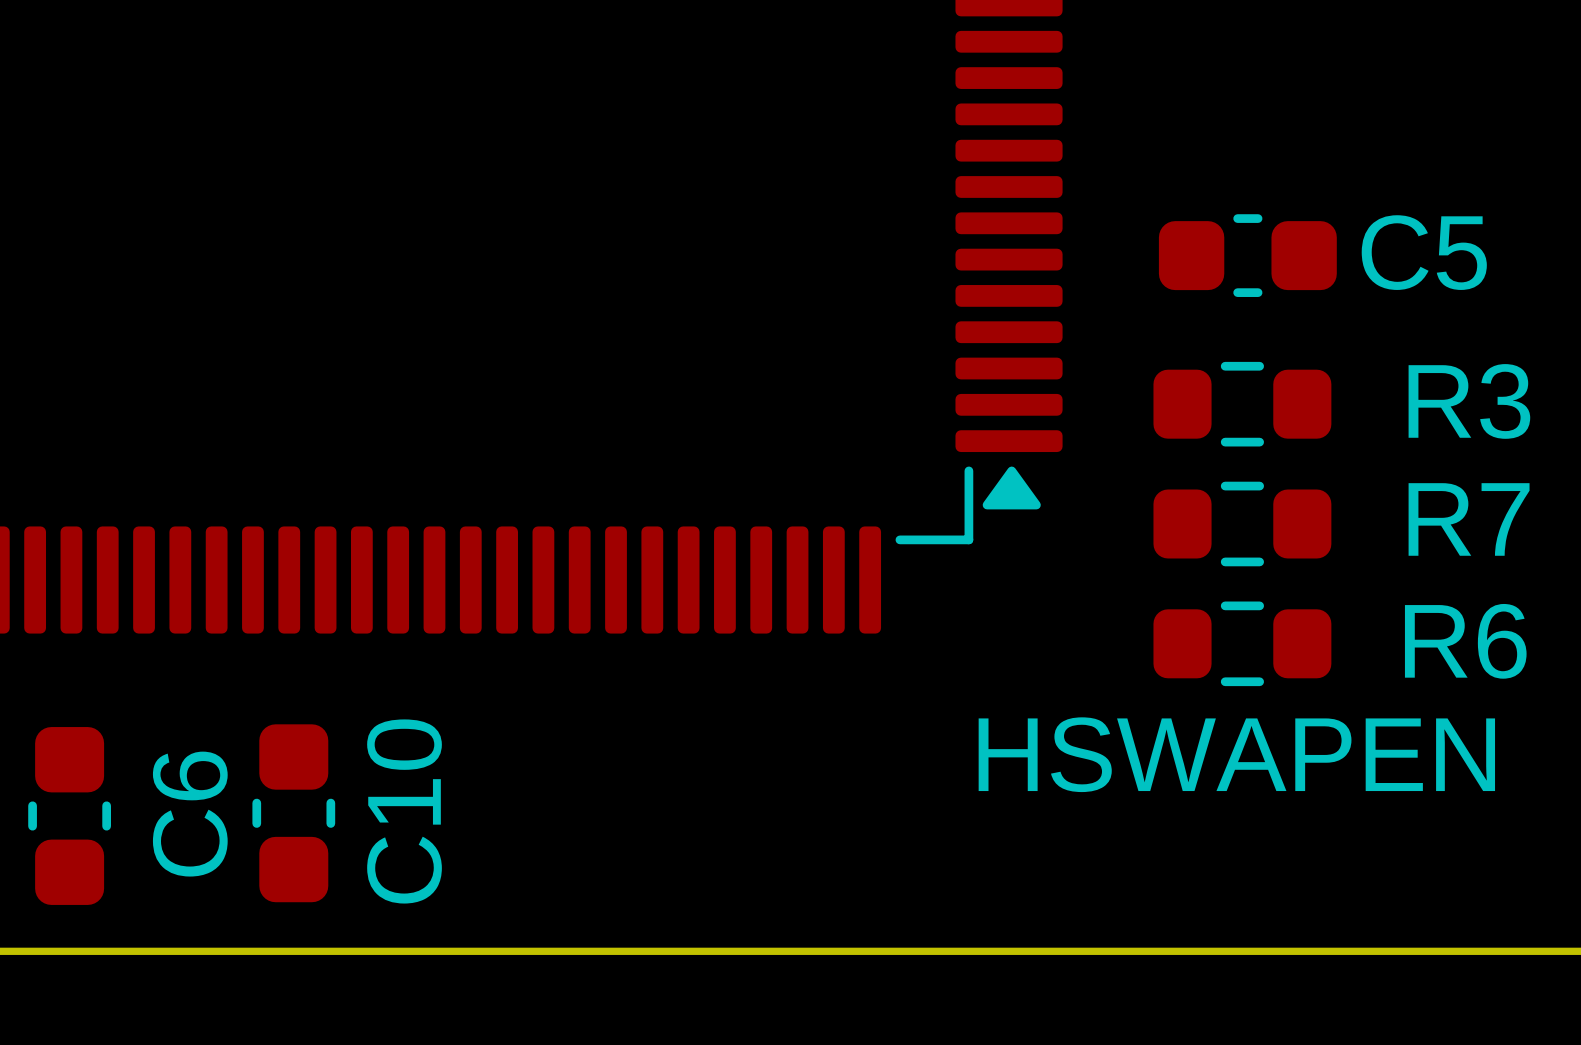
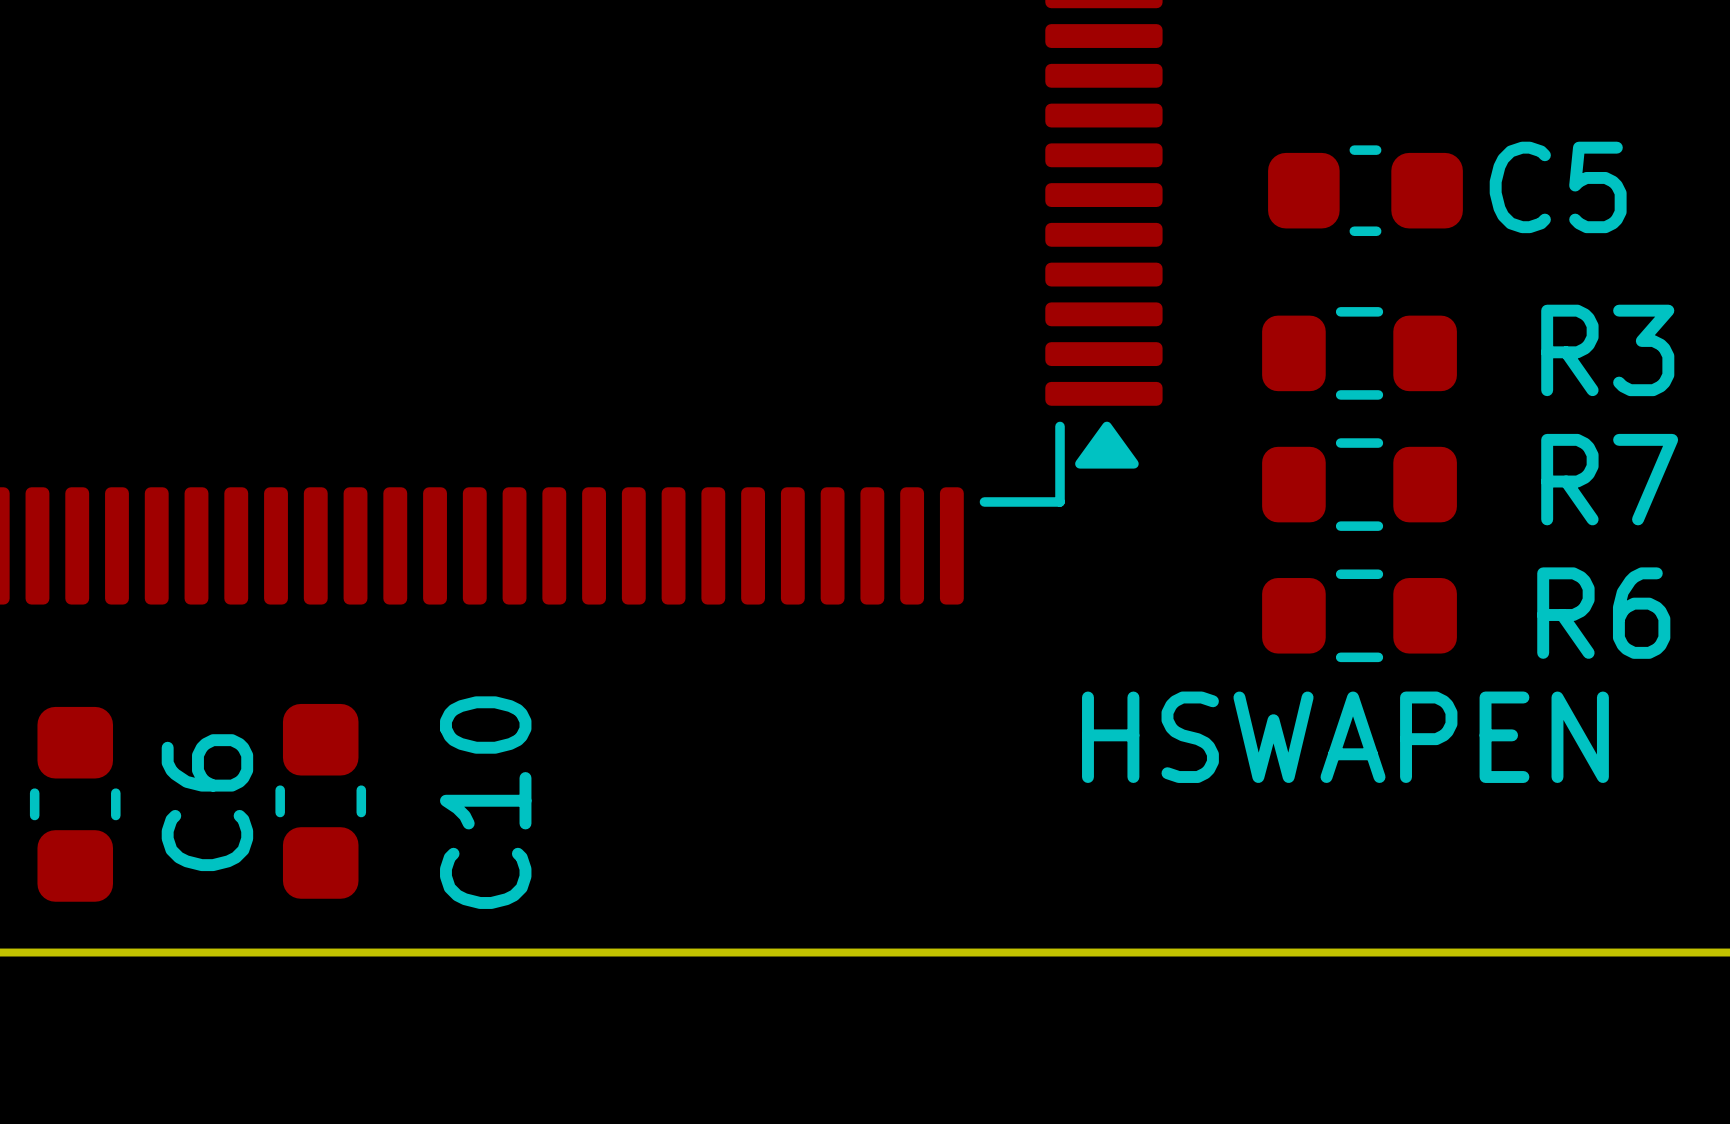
C10 name position: C10 (404, 811) -> C10 (485, 802)

